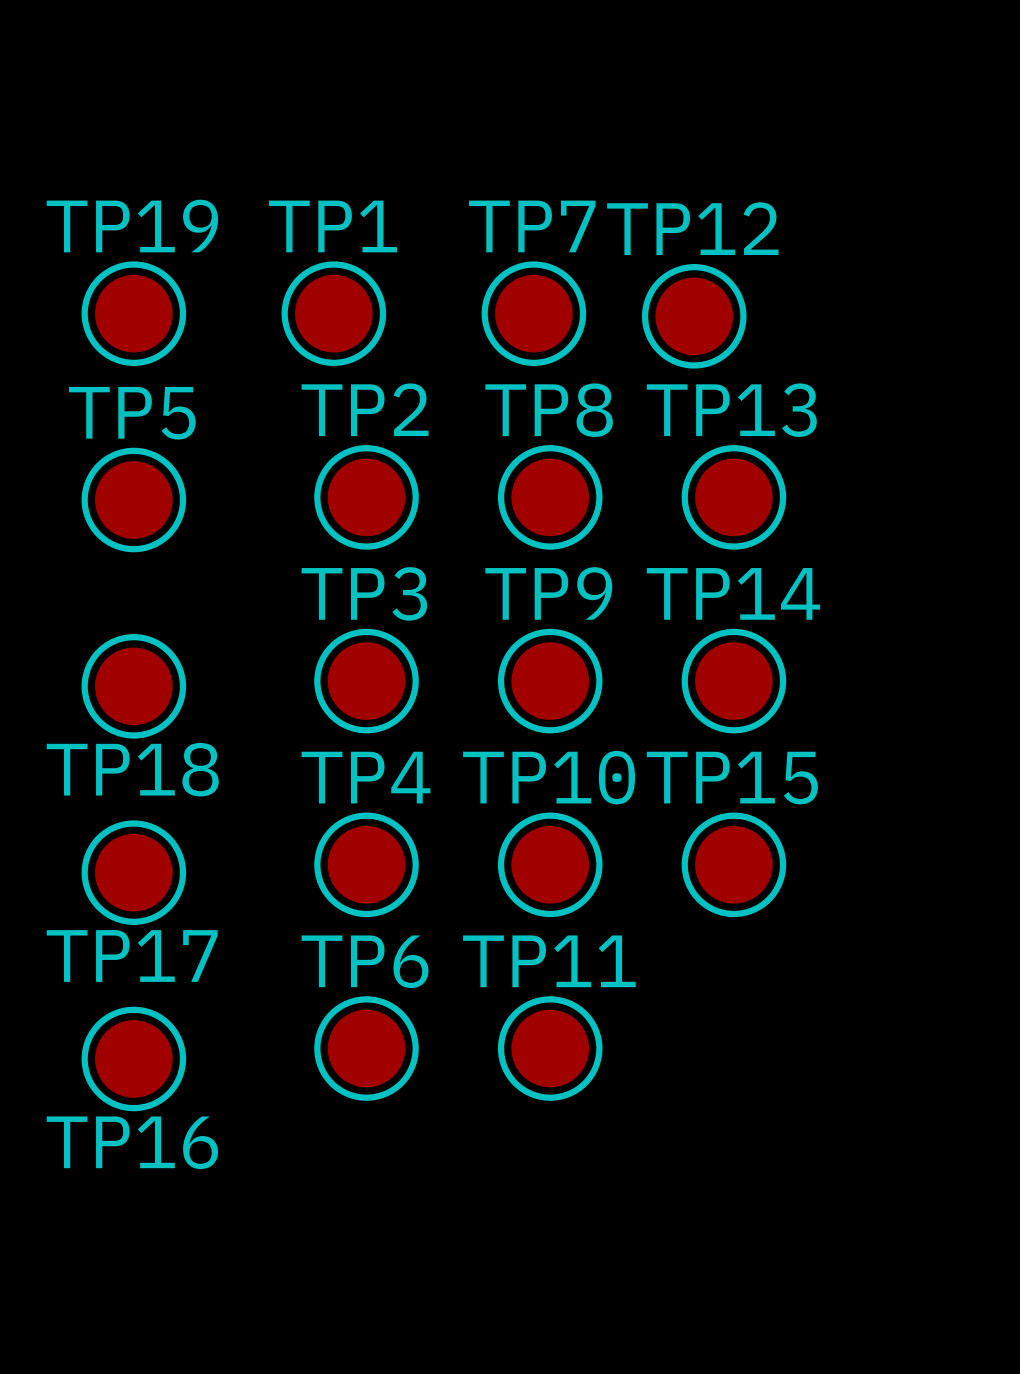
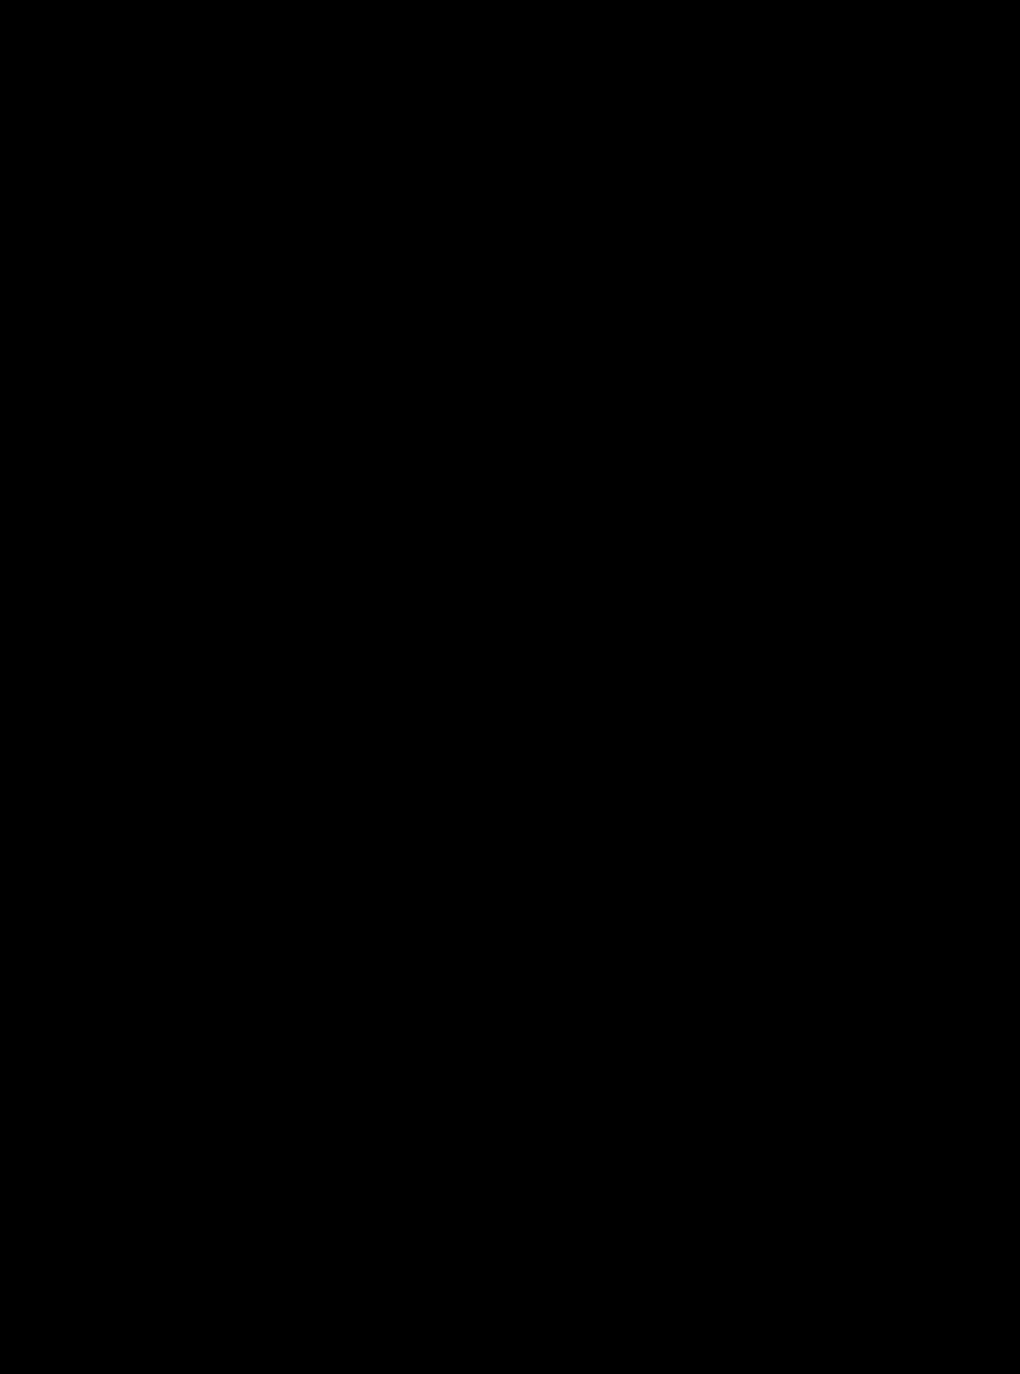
TP19: (133, 313) -> none
TP1: (333, 313) -> none
TP7: (533, 313) -> none
TP12: (694, 316) -> none
TP2: (366, 497) -> none
TP8: (550, 497) -> none
TP13: (733, 497) -> none
TP5: (133, 500) -> none
TP3: (366, 681) -> none
TP9: (550, 681) -> none
TP14: (733, 681) -> none
TP18: (133, 686) -> none
TP4: (366, 864) -> none
TP10: (550, 864) -> none
TP15: (733, 864) -> none
TP17: (133, 872) -> none
TP6: (366, 1048) -> none
TP11: (550, 1048) -> none
TP16: (133, 1058) -> none

